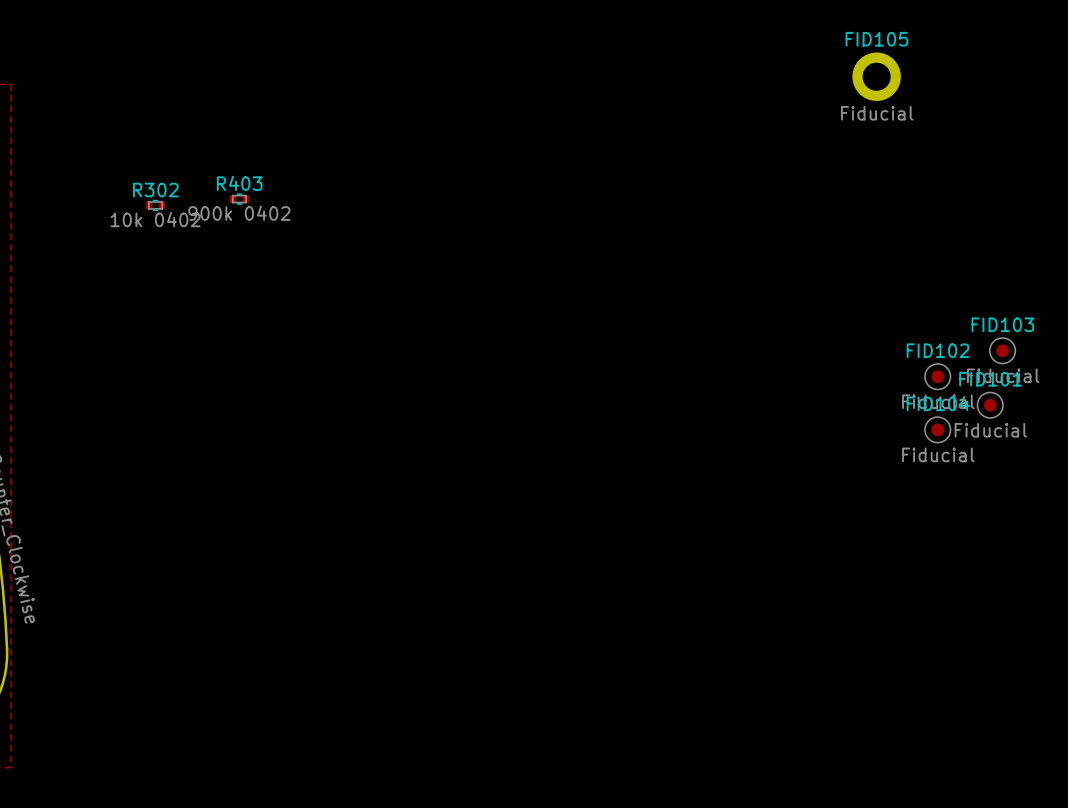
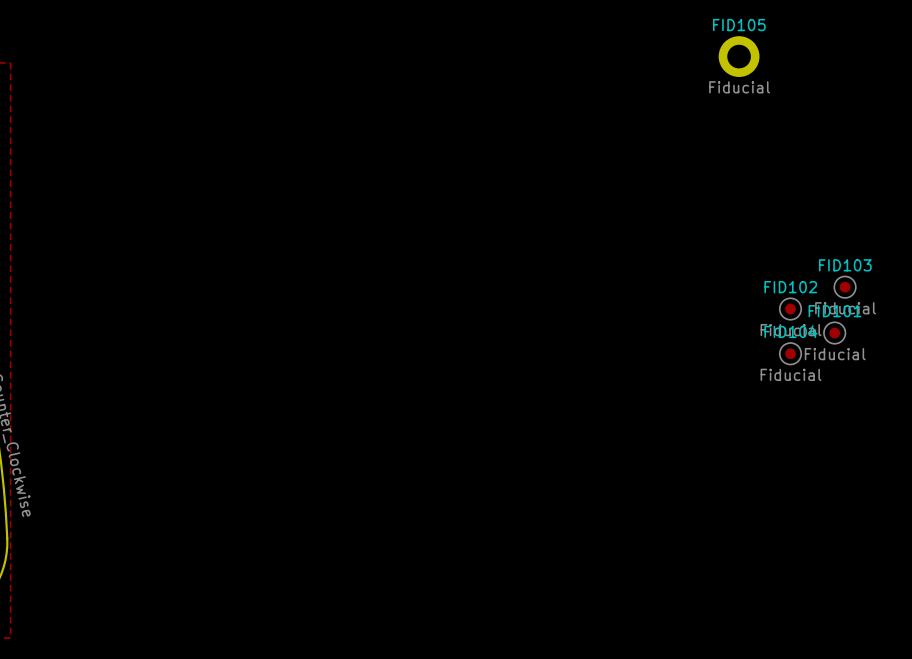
R403: 900k 0402 (239, 199) -> none
R302: 10k 0402 (155, 205) -> none

